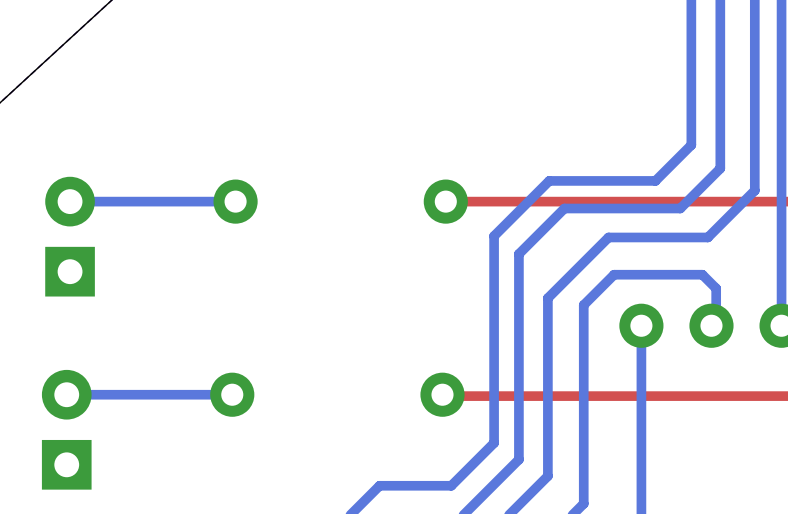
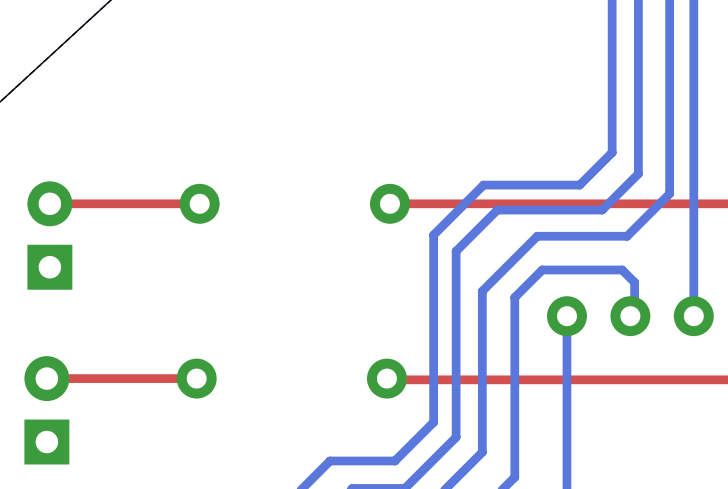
bottom track: (235, 201) (70, 201) -> none
top track: none -> (199, 203) (49, 203)
bottom track: (232, 394) (66, 394) -> none
top track: none -> (196, 378) (46, 378)

